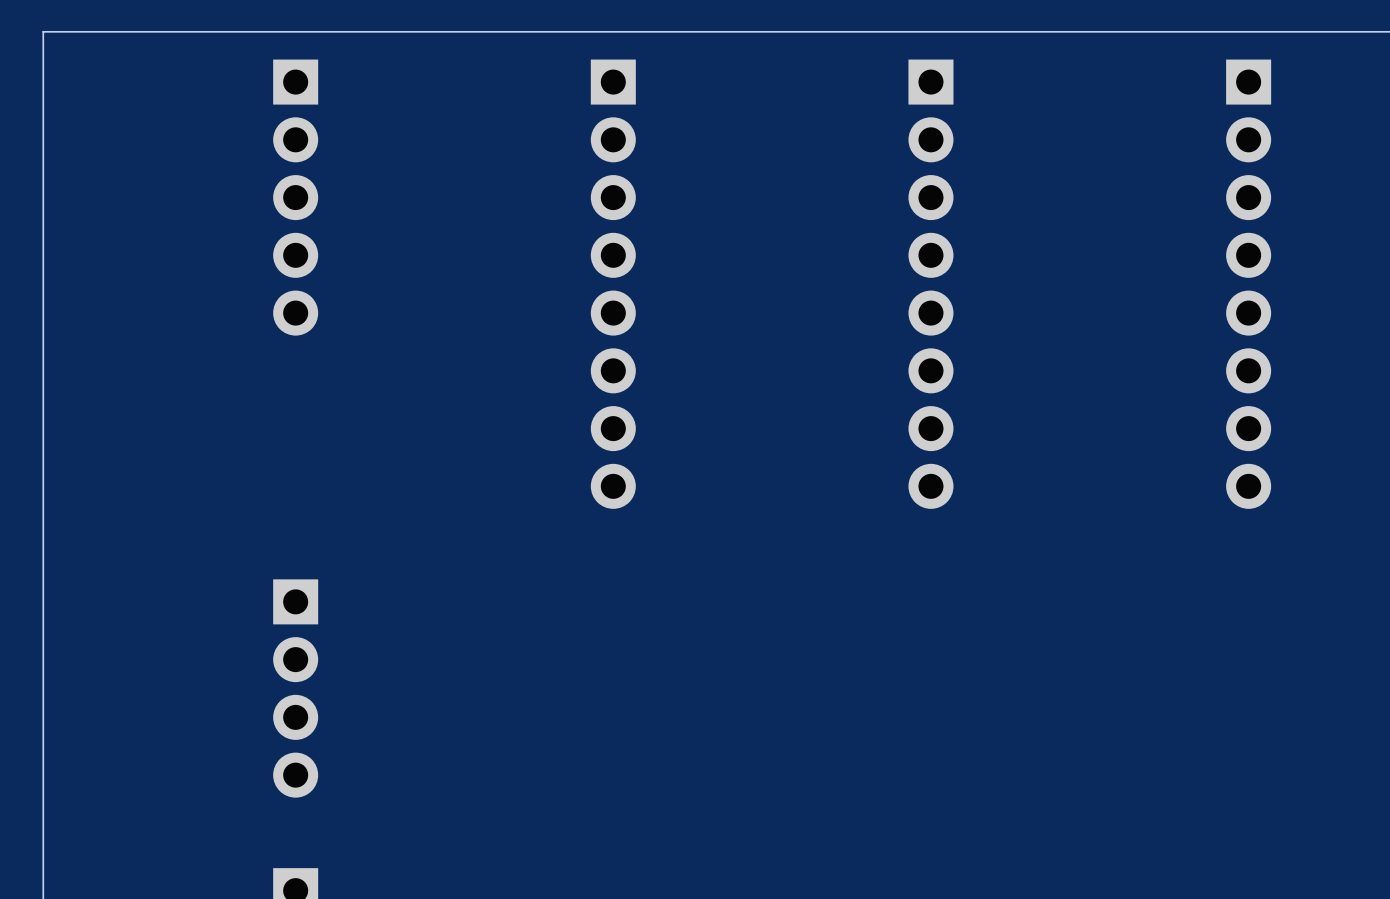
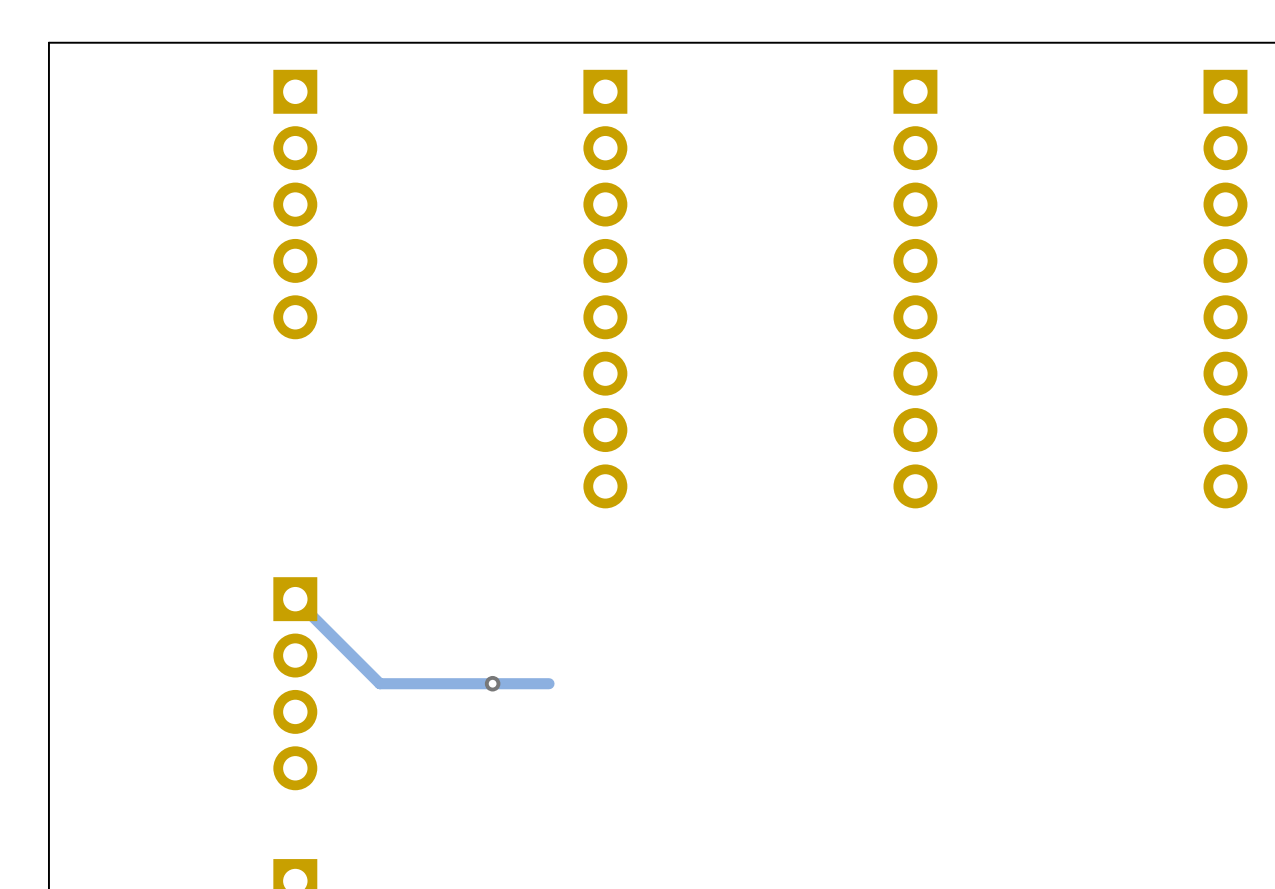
track: none -> (295, 599) (379, 683) (549, 683)
via: none -> (492, 683)

